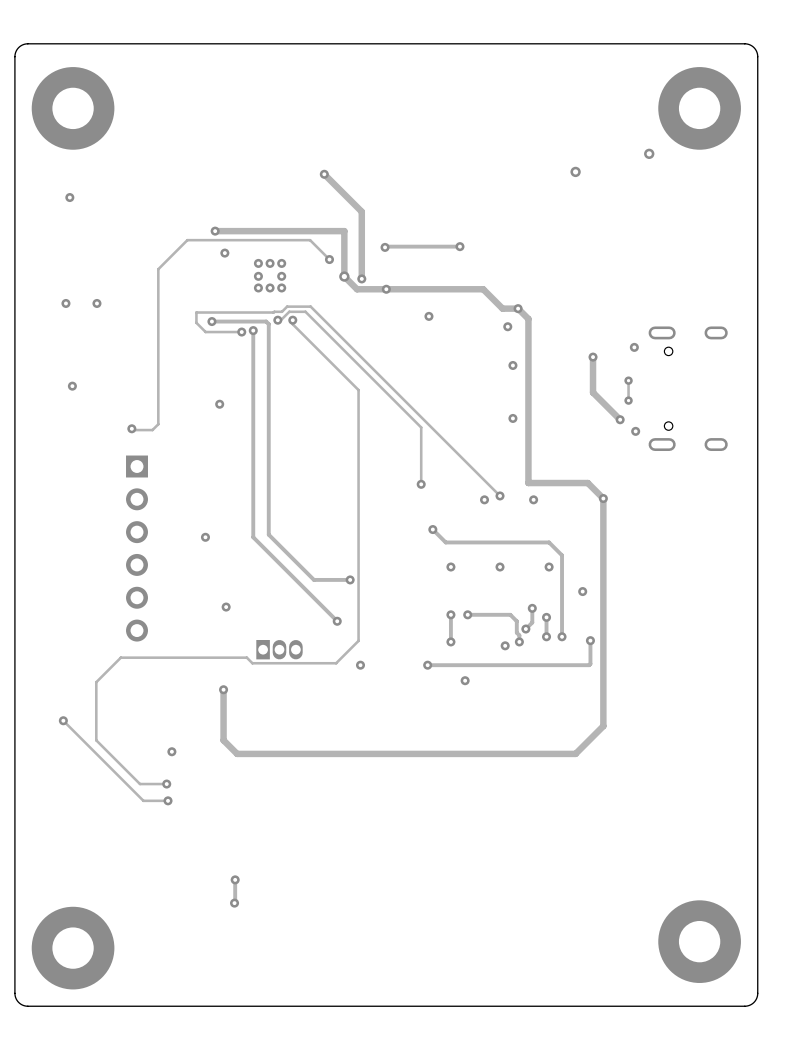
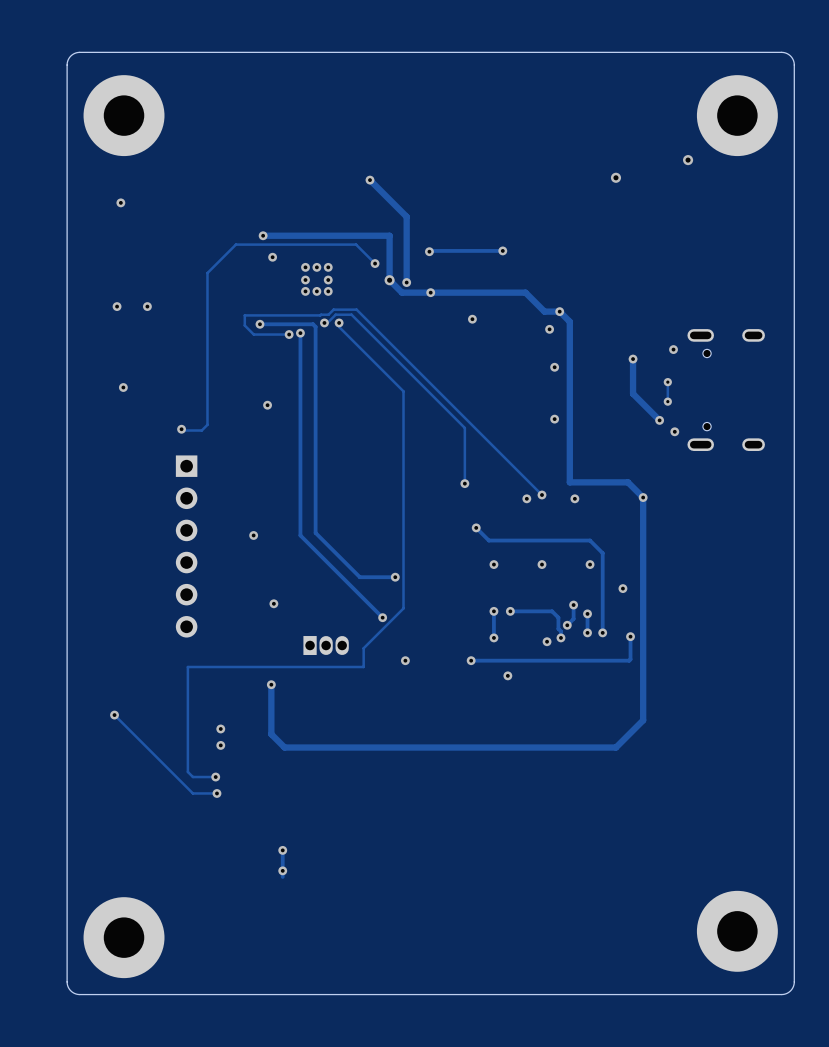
track: (358, 611) (358, 640) (336, 663) (252, 663) (246, 657) (120, 657) (96, 682) (96, 740) (140, 784) (143, 784) -> (403, 608) (363, 648) (363, 667) (187, 667) (187, 771) (192, 777)
via: none -> (220, 728)
track: none -> (282, 850) (282, 870)
track: (235, 886) (234, 903) -> none
via position: (234, 903) -> (282, 850)

